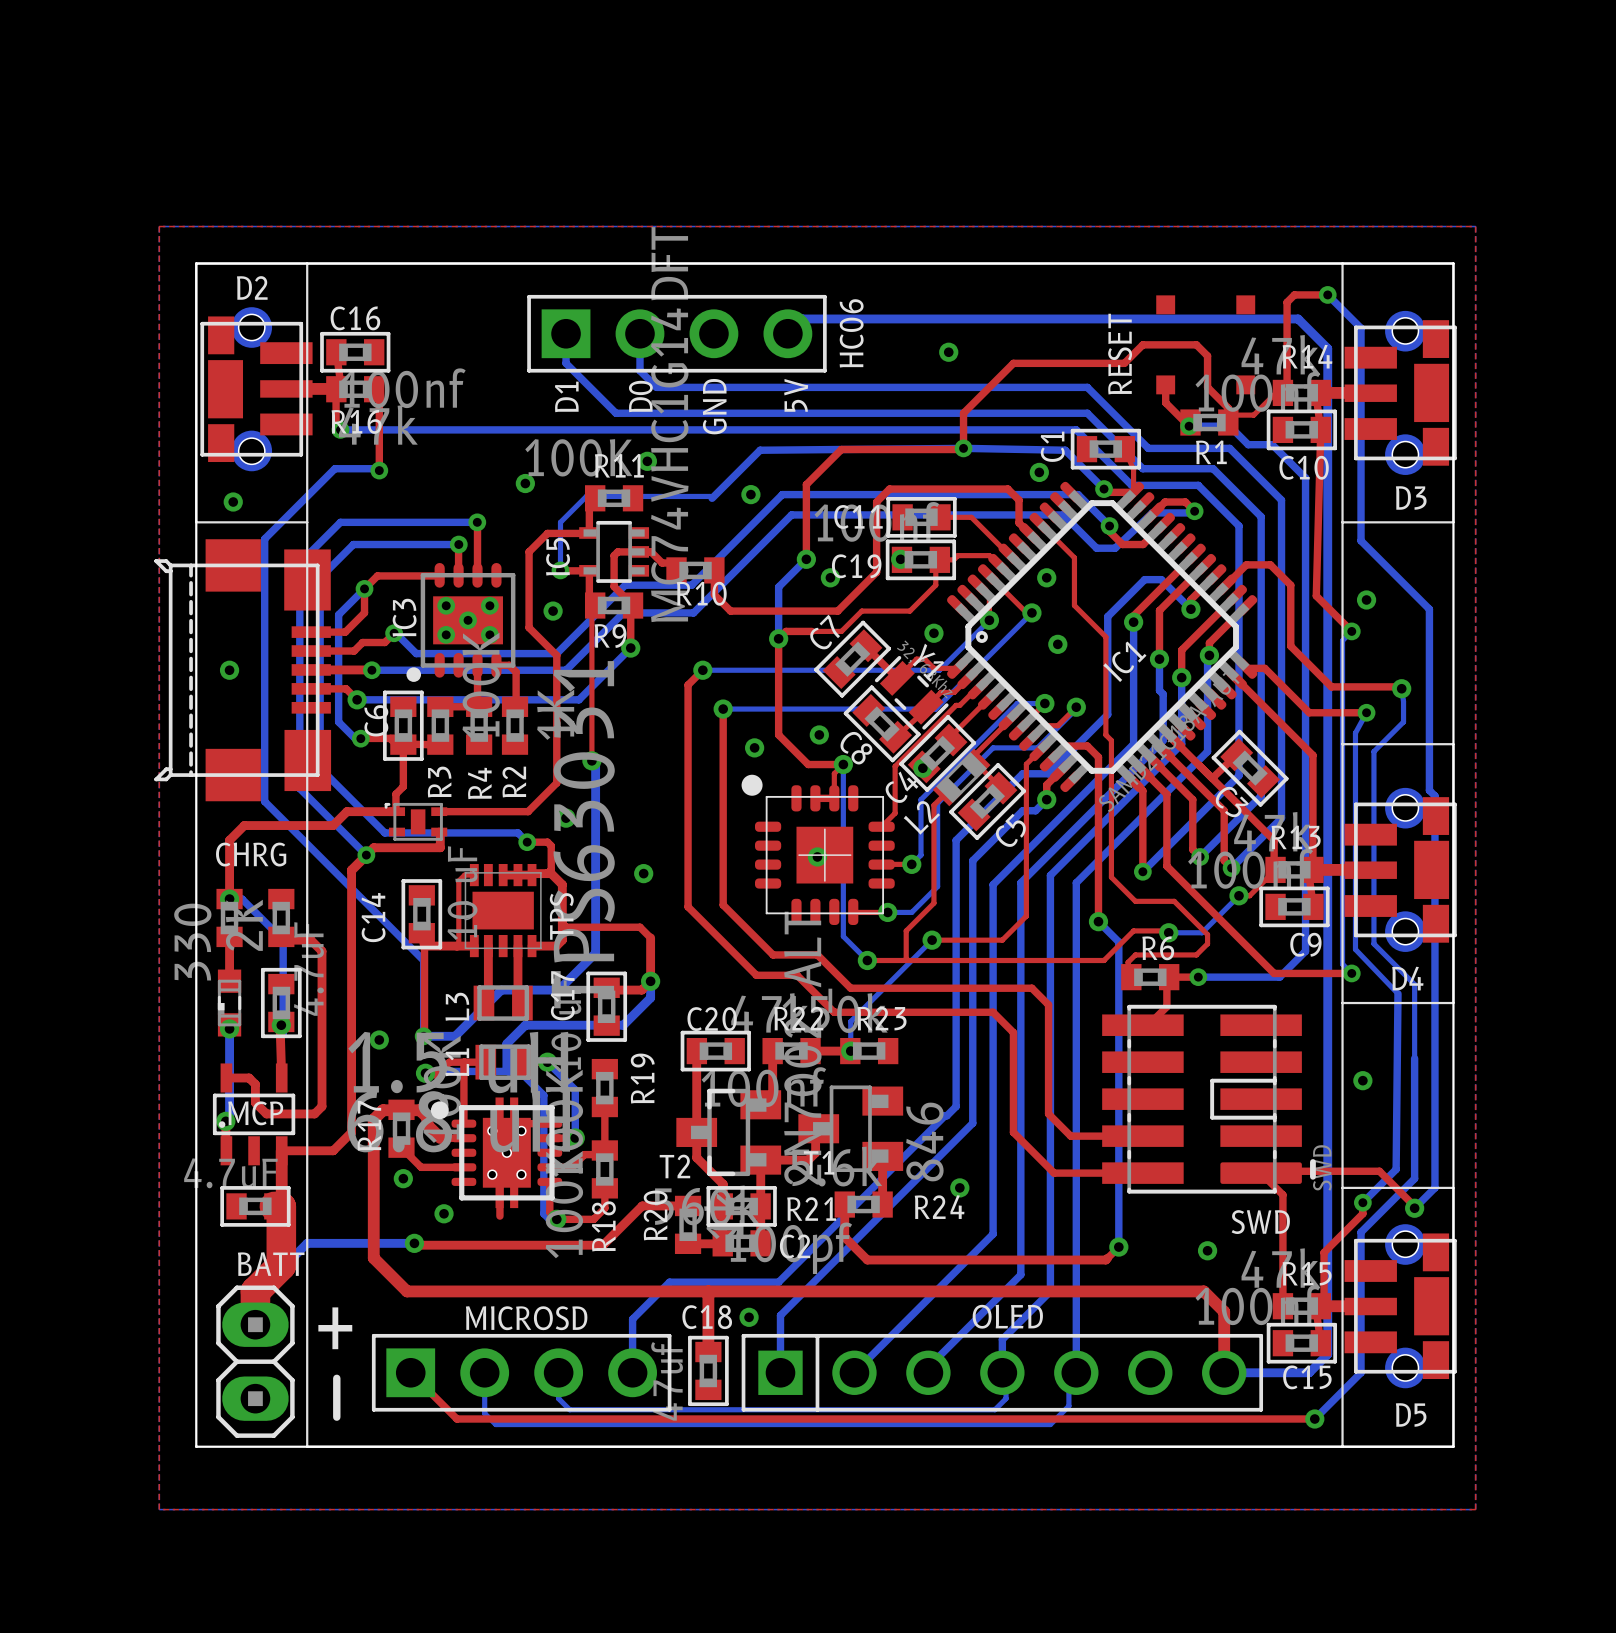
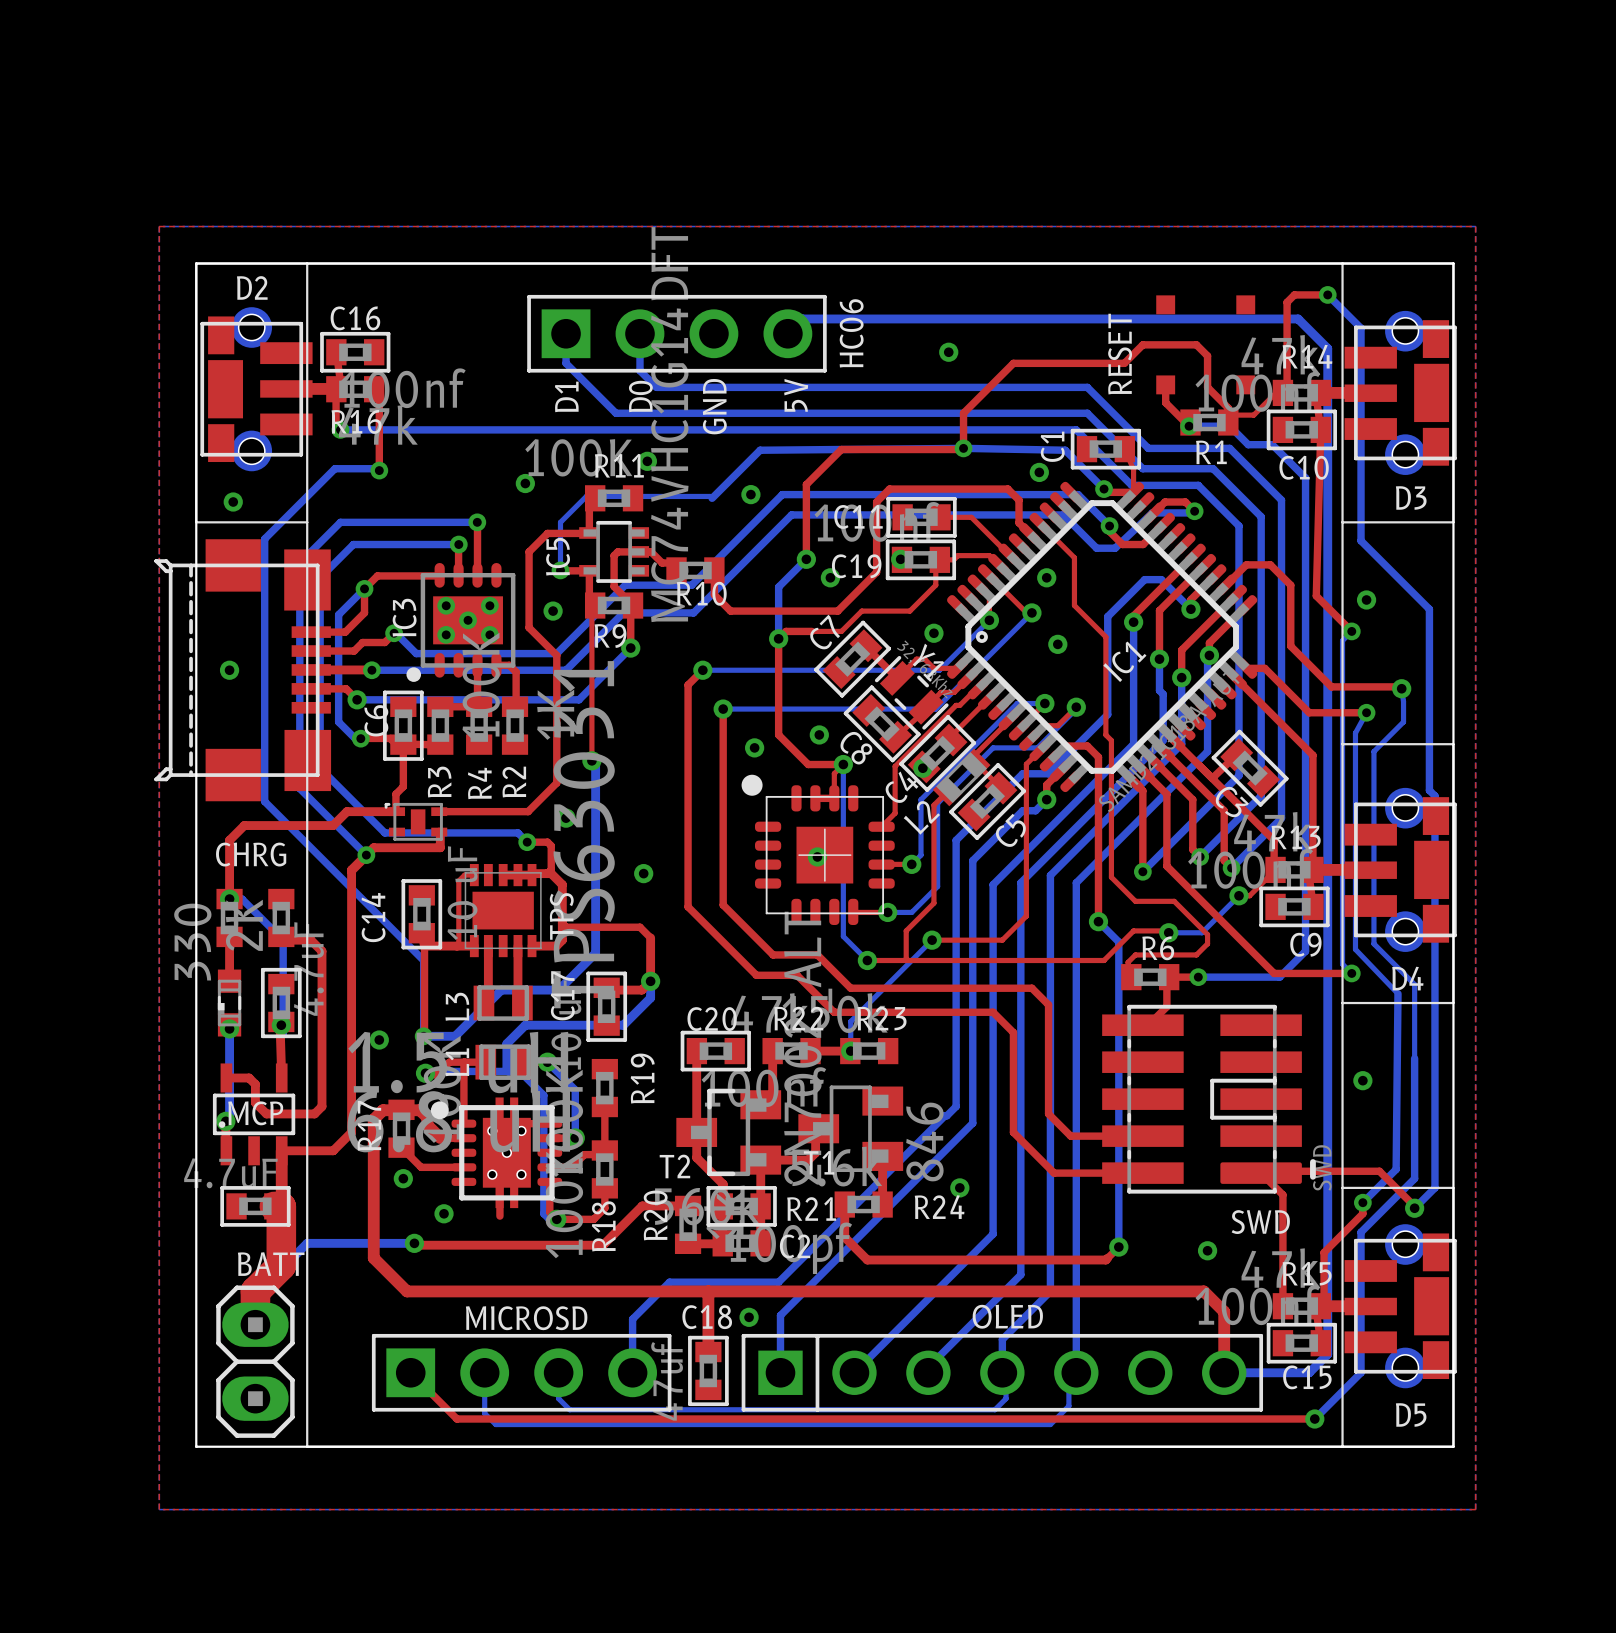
text: + (335, 1328) -> none
line: (336, 1378) (336, 1417) -> none

